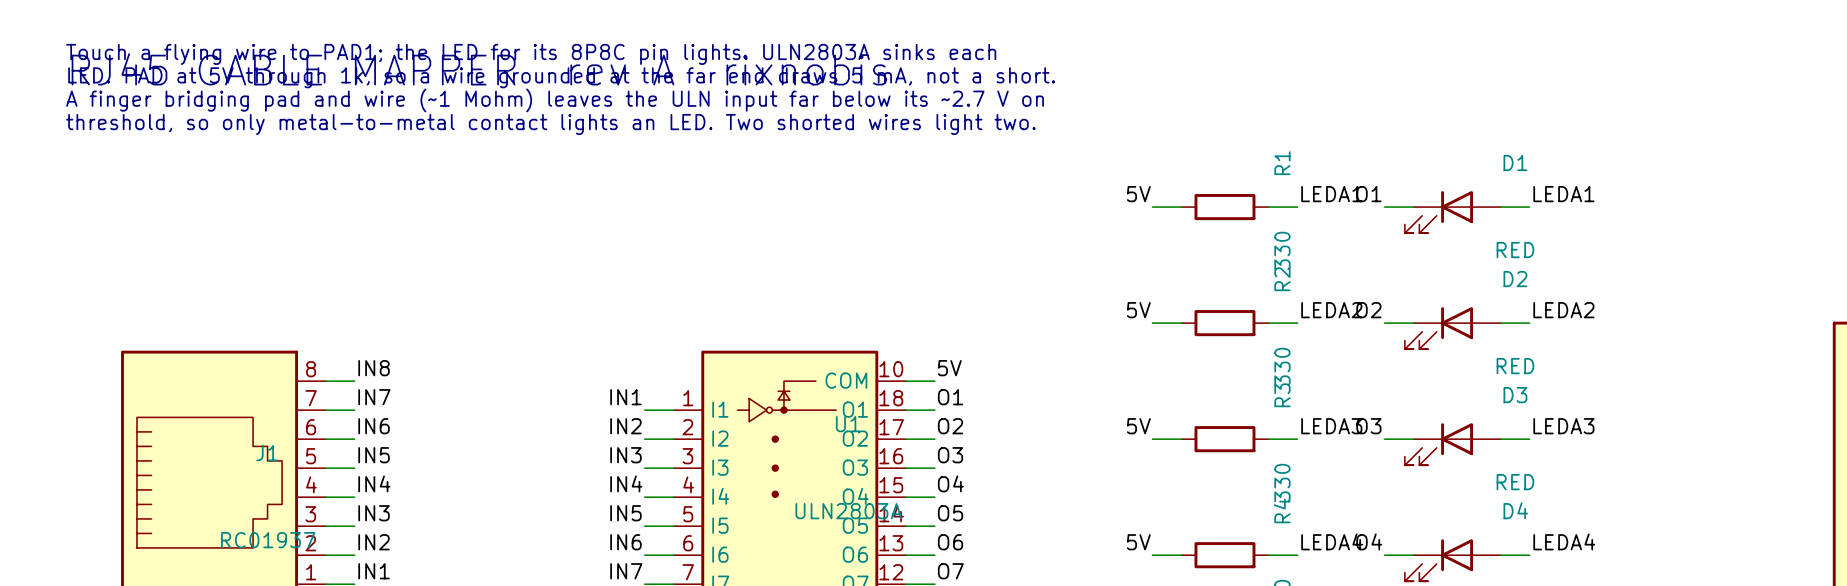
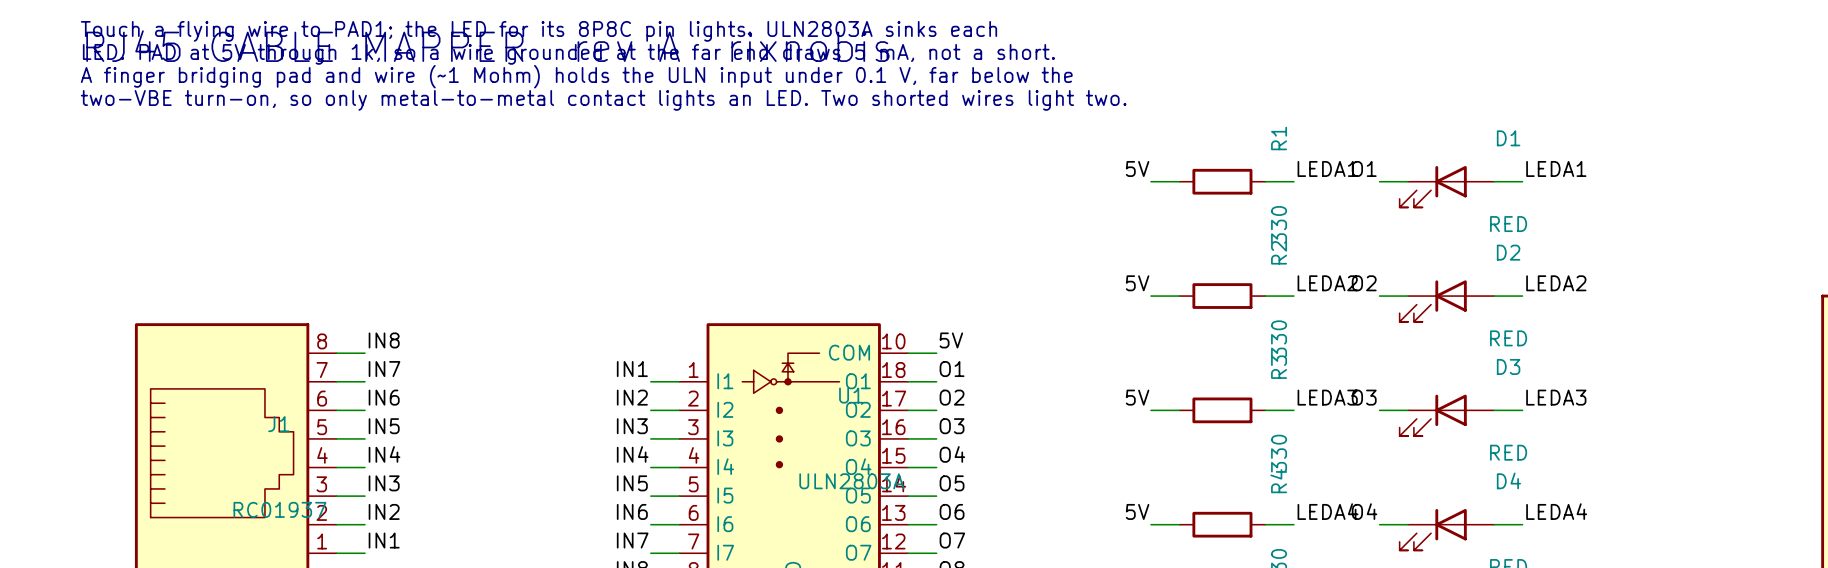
text: A finger bridging pad and wire (~1 Mohm) leaves the ULN input far below its ~2.7 V on (555, 100) -> A finger bridging pad and wire (~1 Mohm) holds the ULN input under 0.1 V, far below the (576, 76)
text: threshold, so only metal-to-metal contact lights an LED. Two shorted wires light two. (550, 124) -> two-VBE turn-on, so only metal-to-metal contact lights an LED. Two shorted wires light two. (603, 100)

